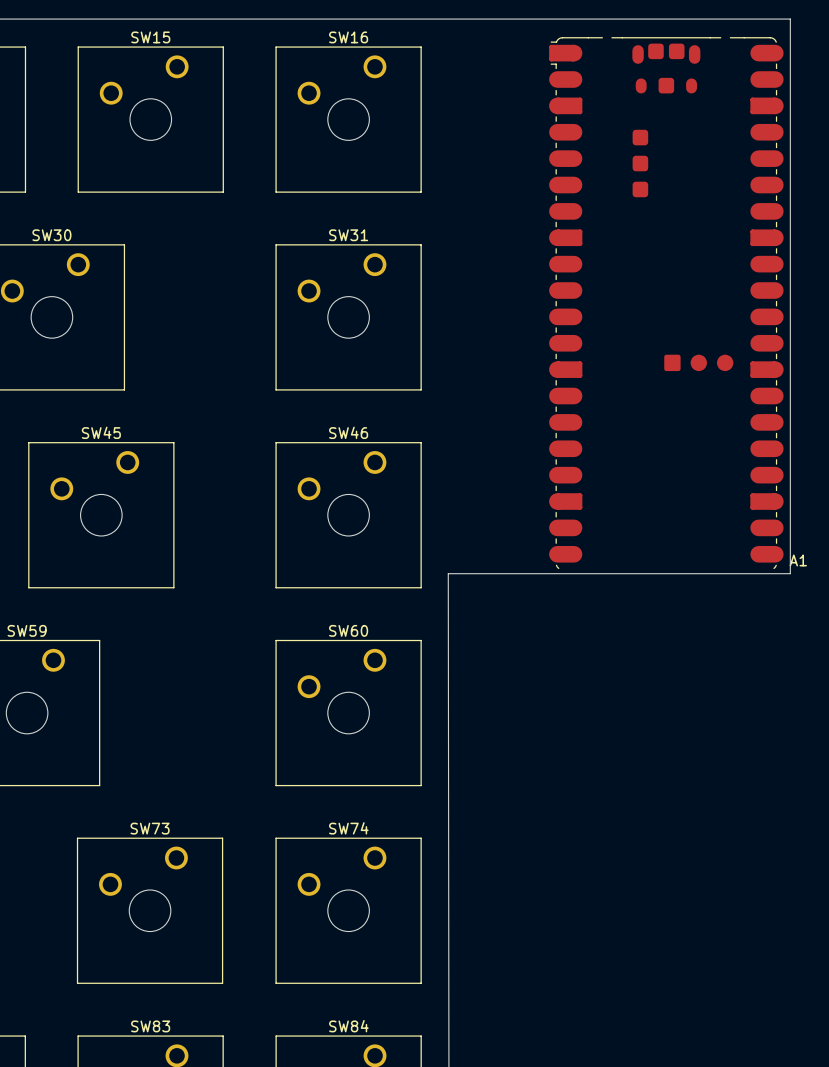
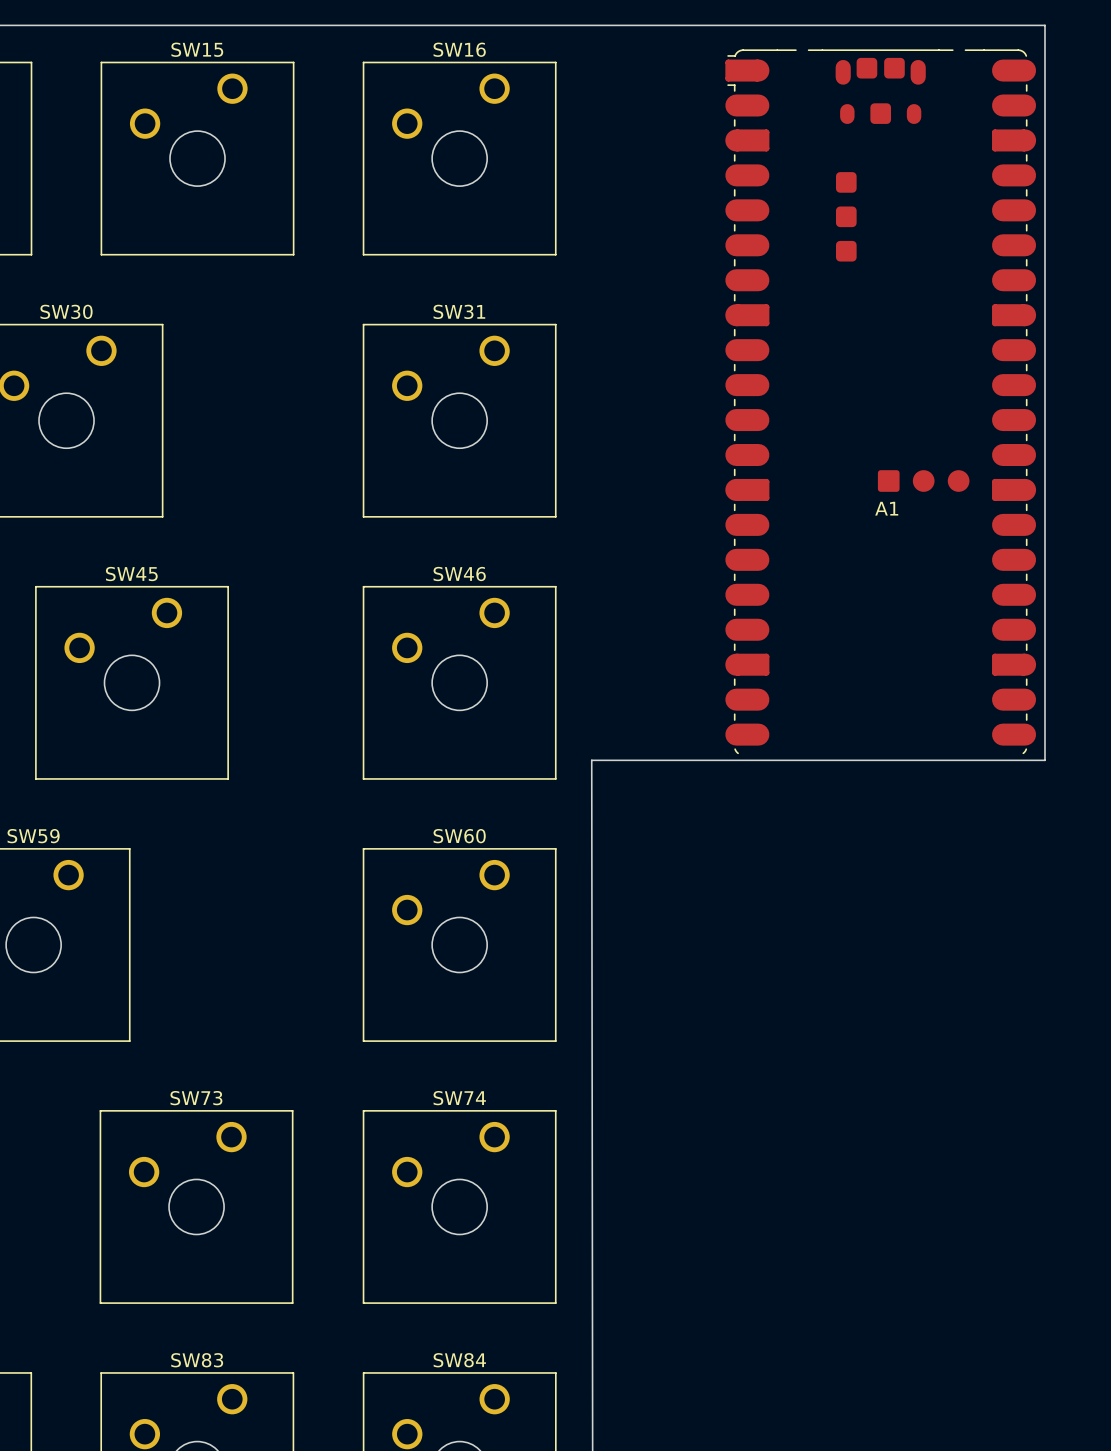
A1 name position: A1 (798, 560) -> A1 (886, 508)

